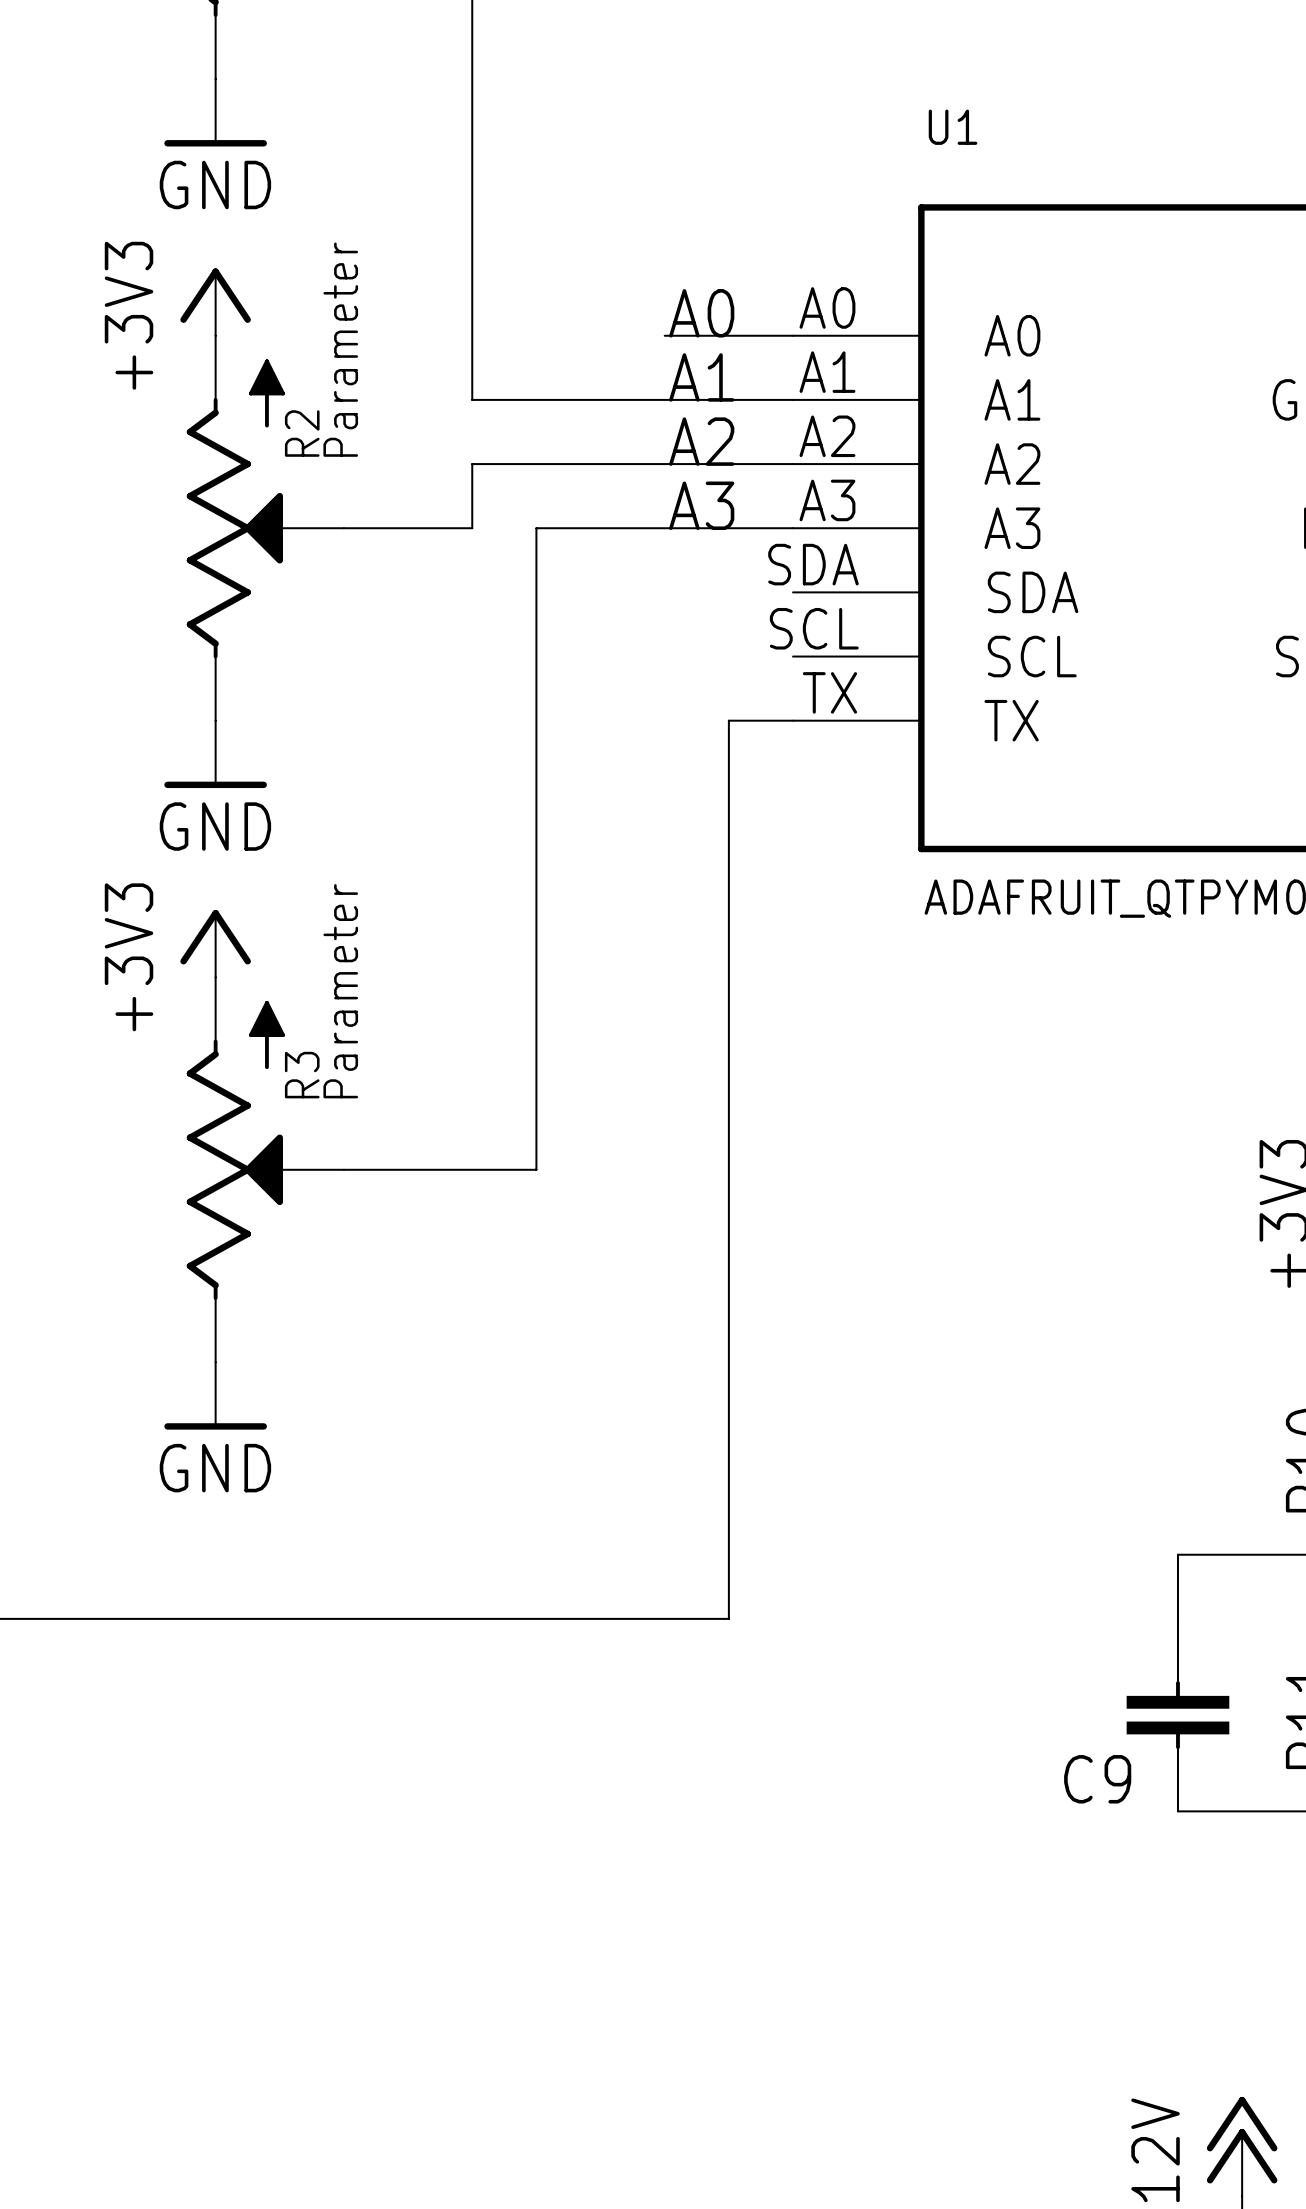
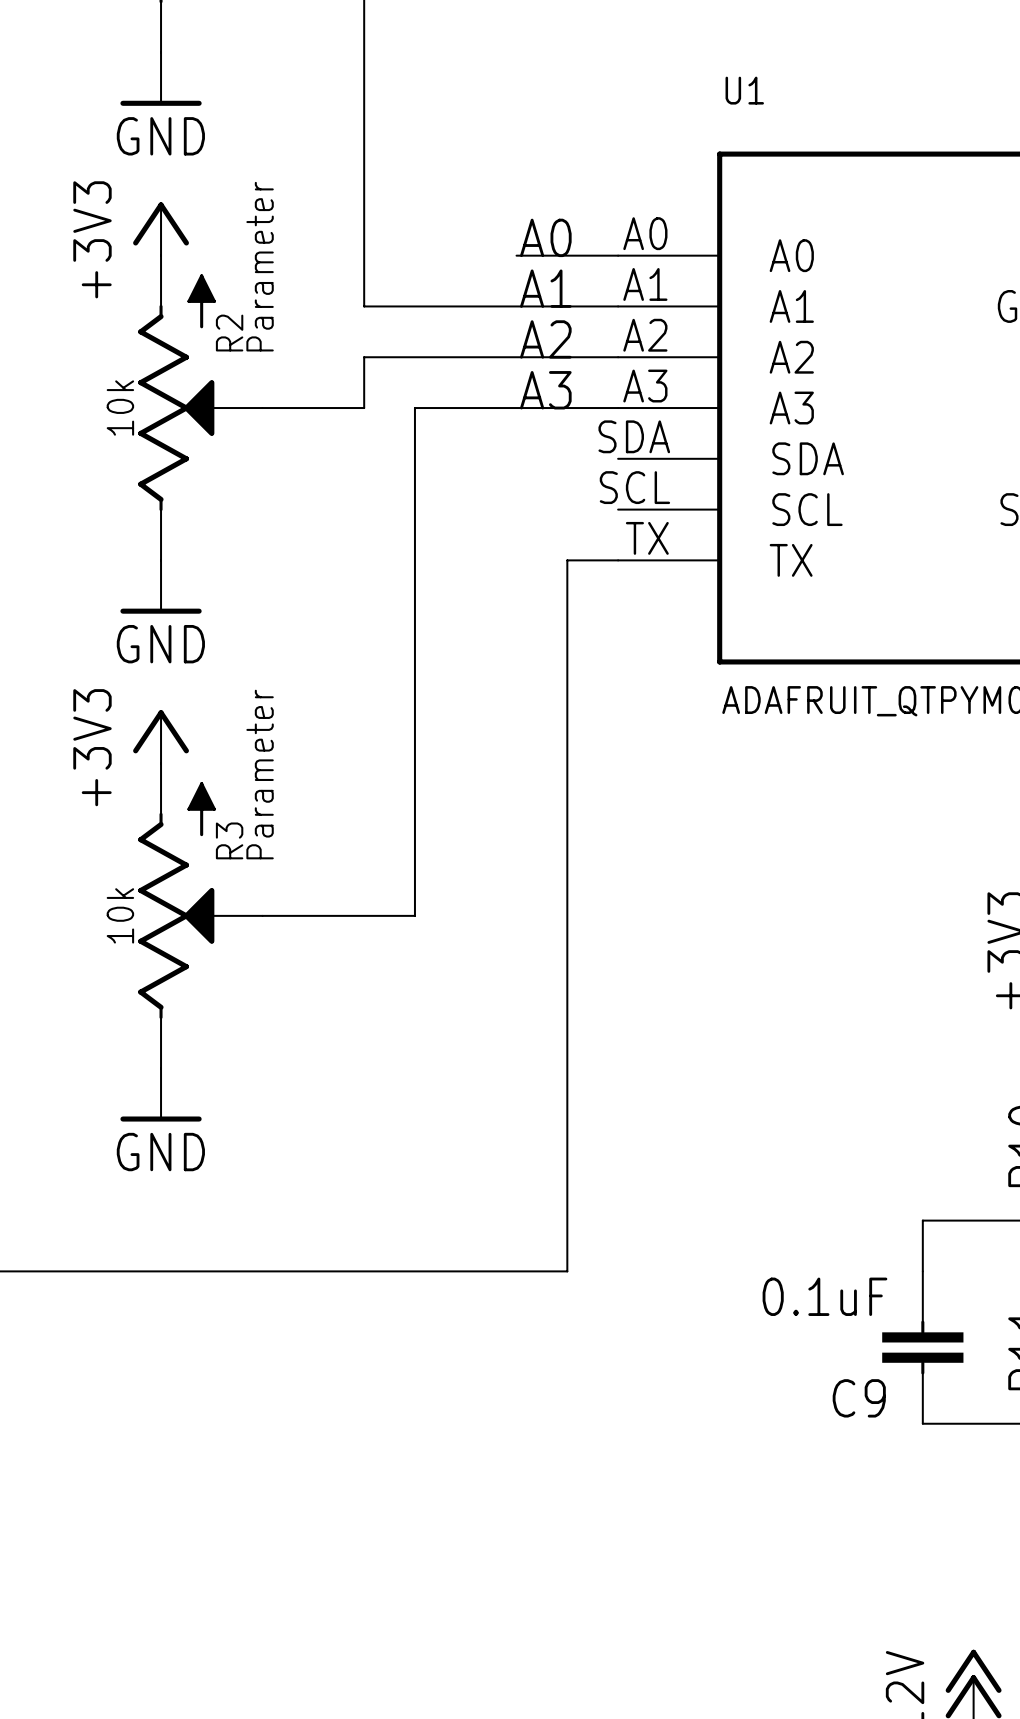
R2 value: none -> 10k (120, 408)
R3 value: none -> 10k (120, 915)
C9 value: none -> 0.1uF (824, 1296)

